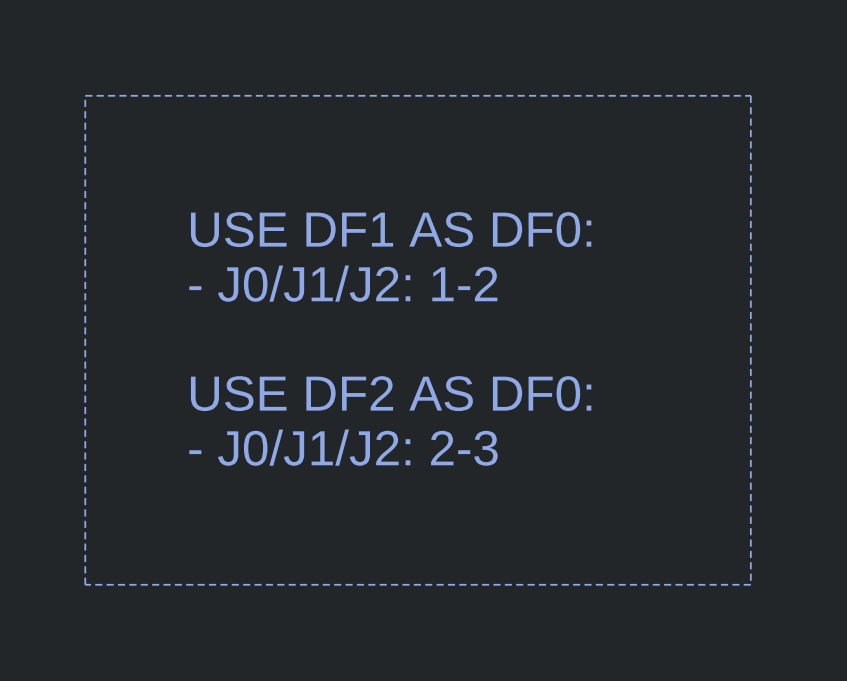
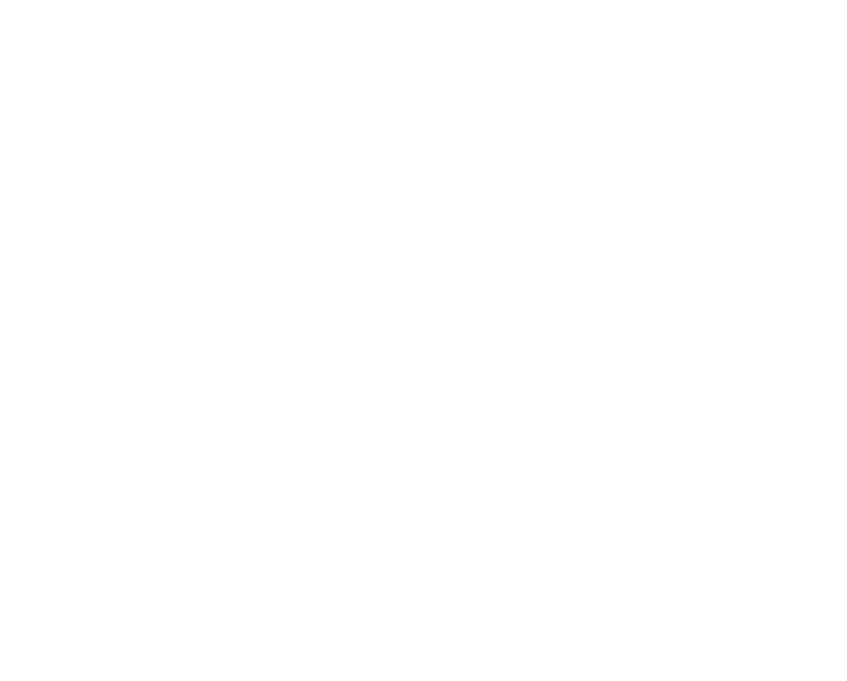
line: (85, 95) (750, 95) (750, 584) (85, 584) (85, 95) -> none
text: USE DF1 AS DF0: (391, 229) -> none
text: - J0/J1/J2: 1-2 (343, 283) -> none
text: USE DF2 AS DF0: (391, 393) -> none
text: - J0/J1/J2: 2-3 (343, 447) -> none

